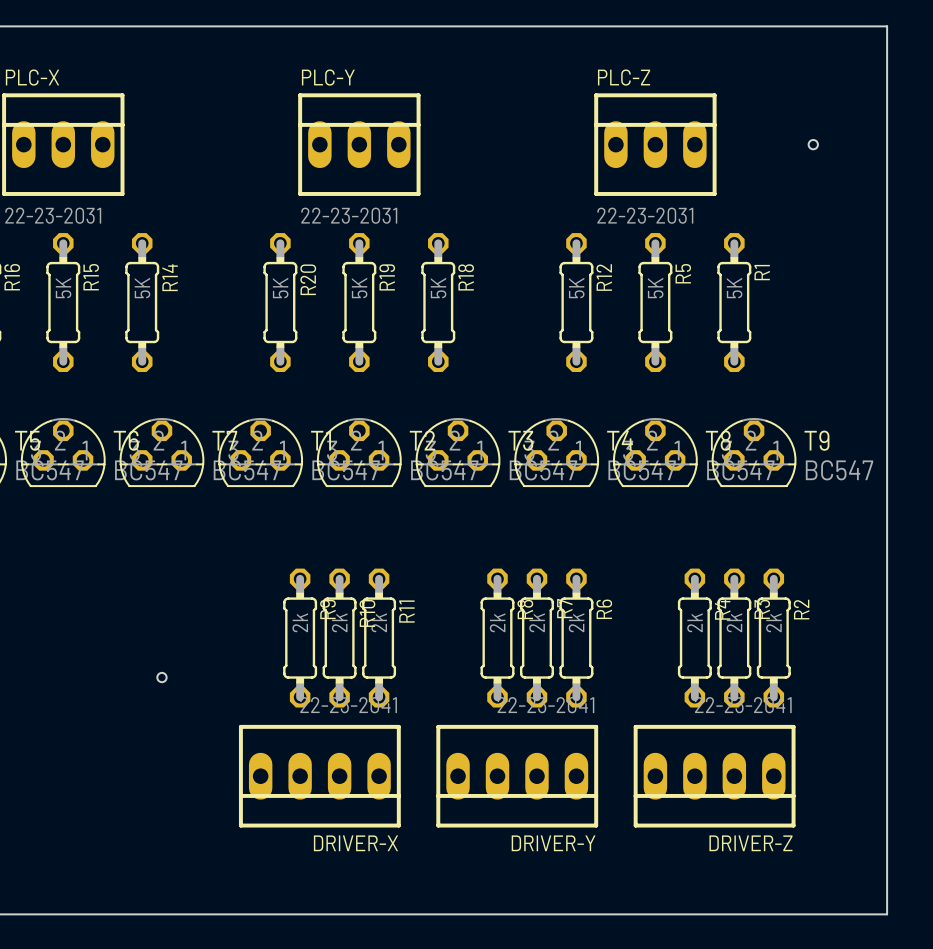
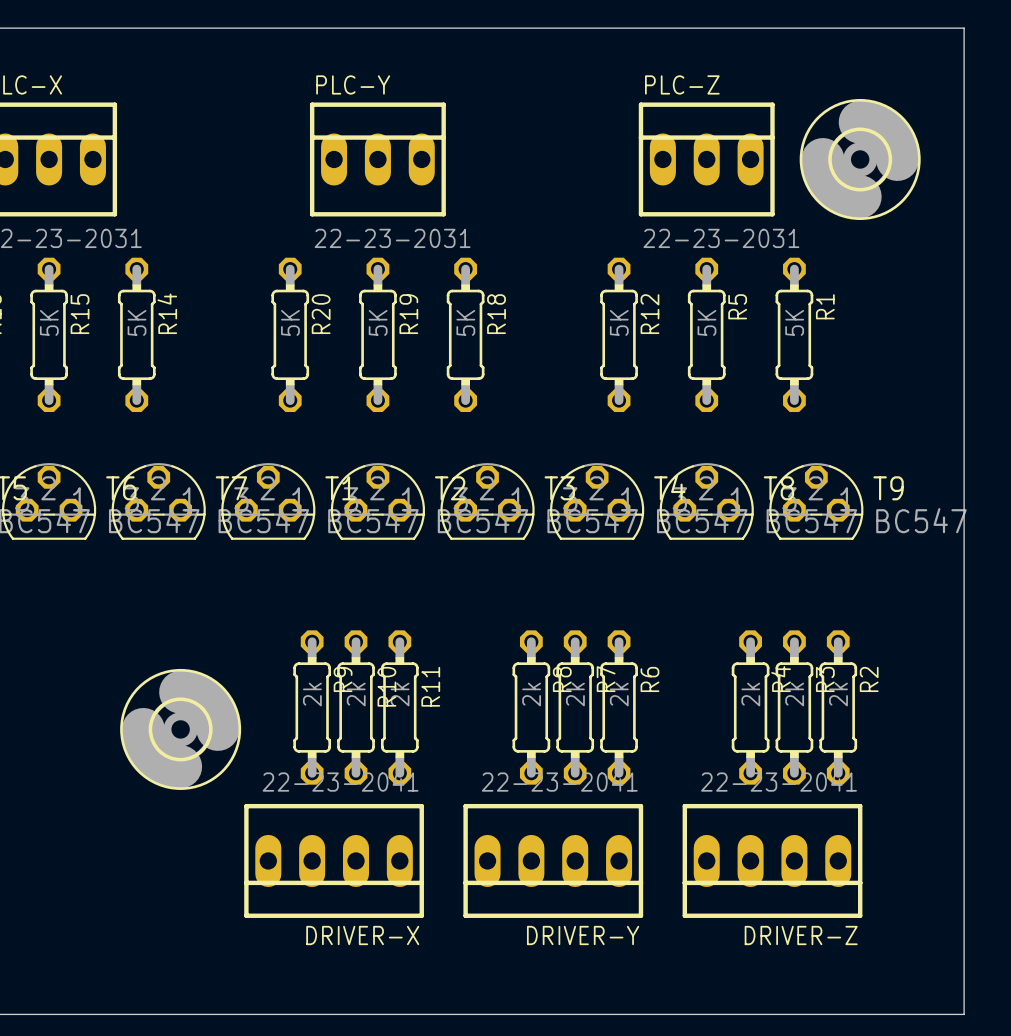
part: none -> (860, 159)
hole: (813, 144) -> none
part: none -> (180, 729)
hole: (161, 677) -> none

